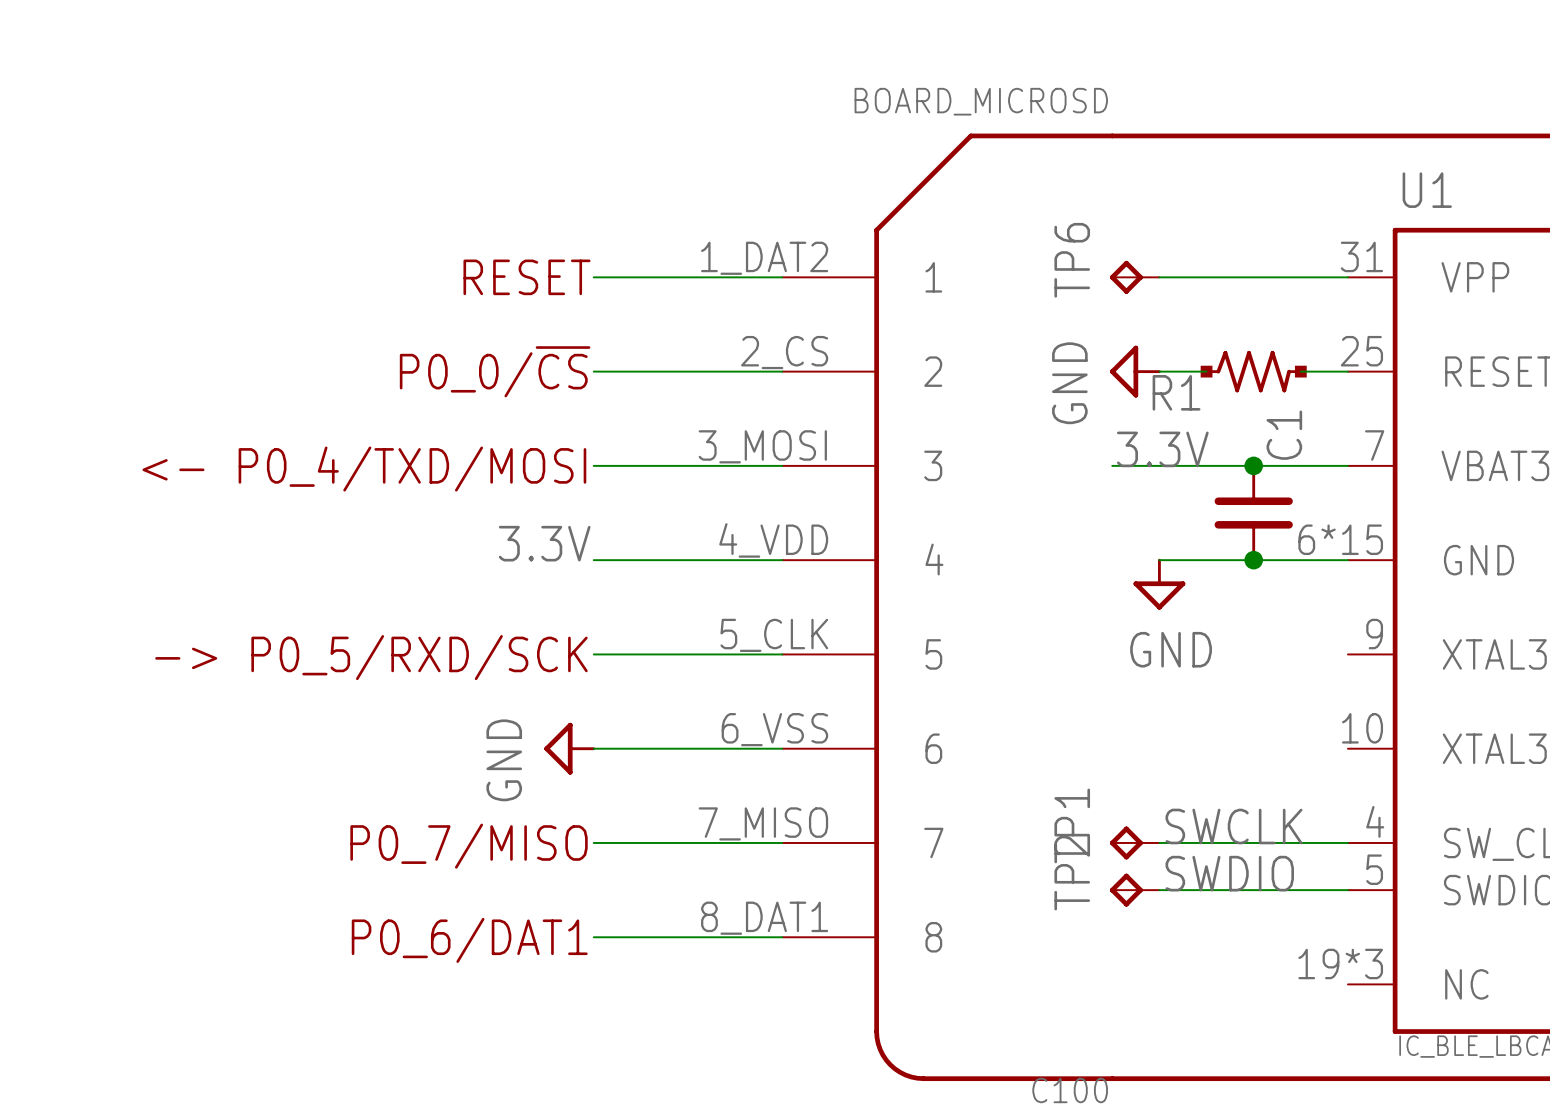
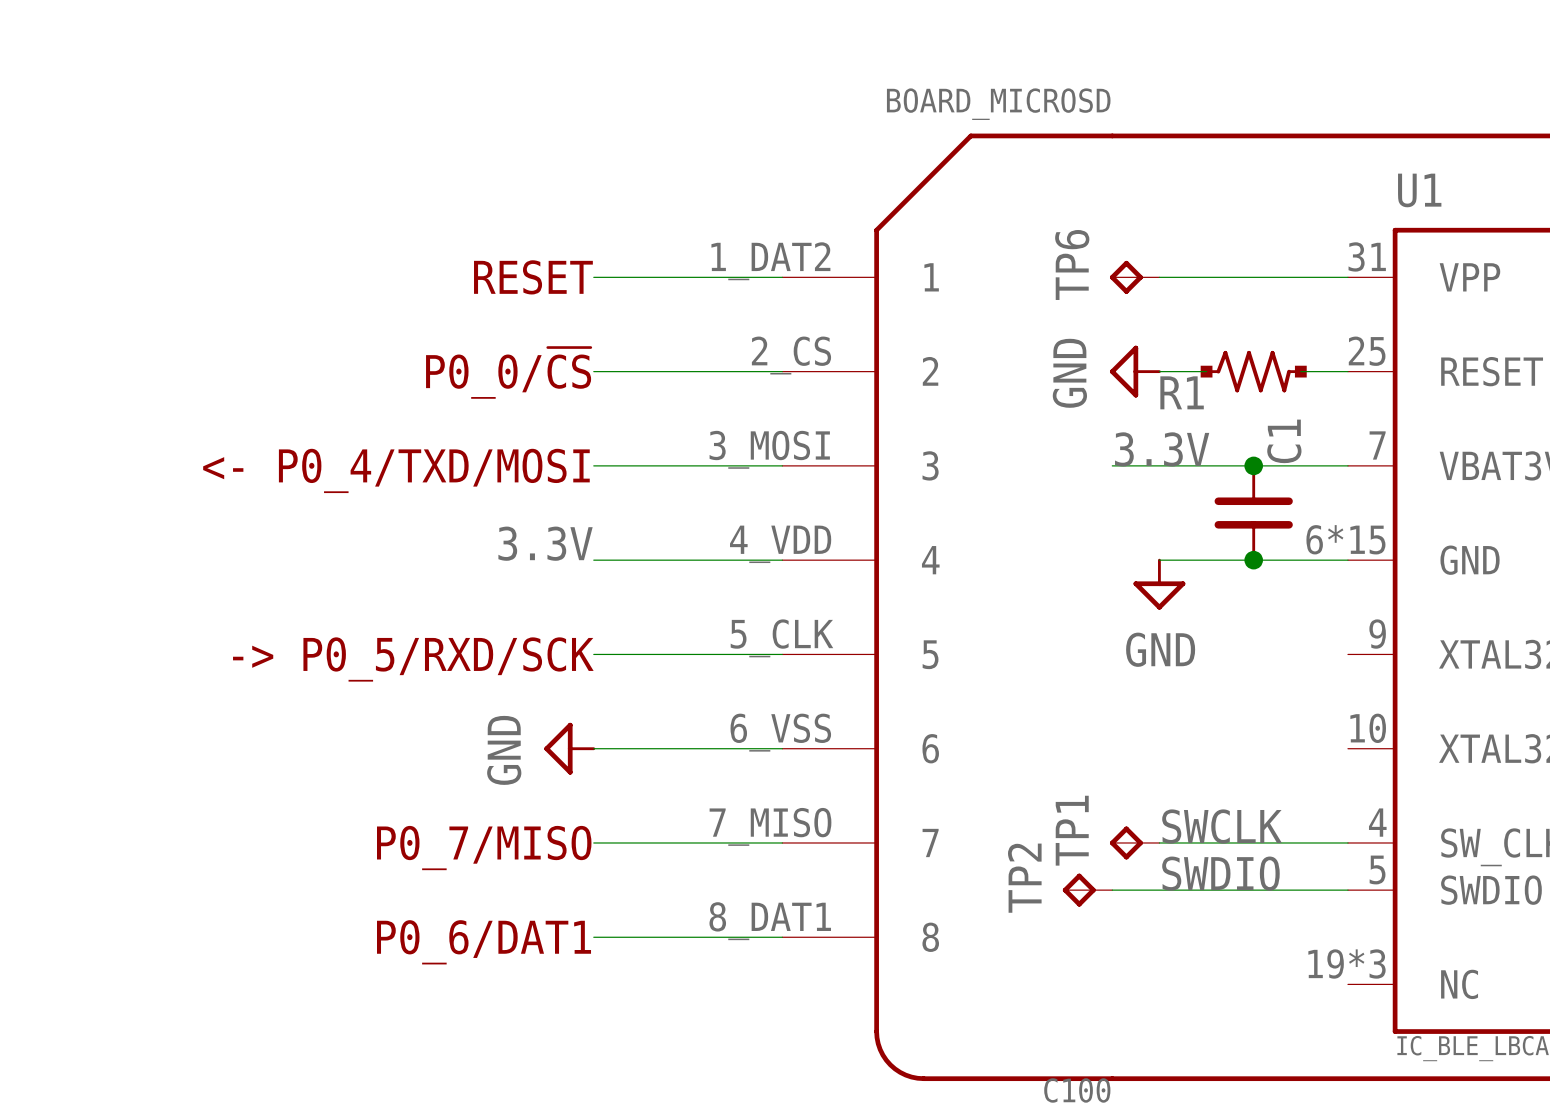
TP2 position: (1134, 890) -> (1087, 890)

